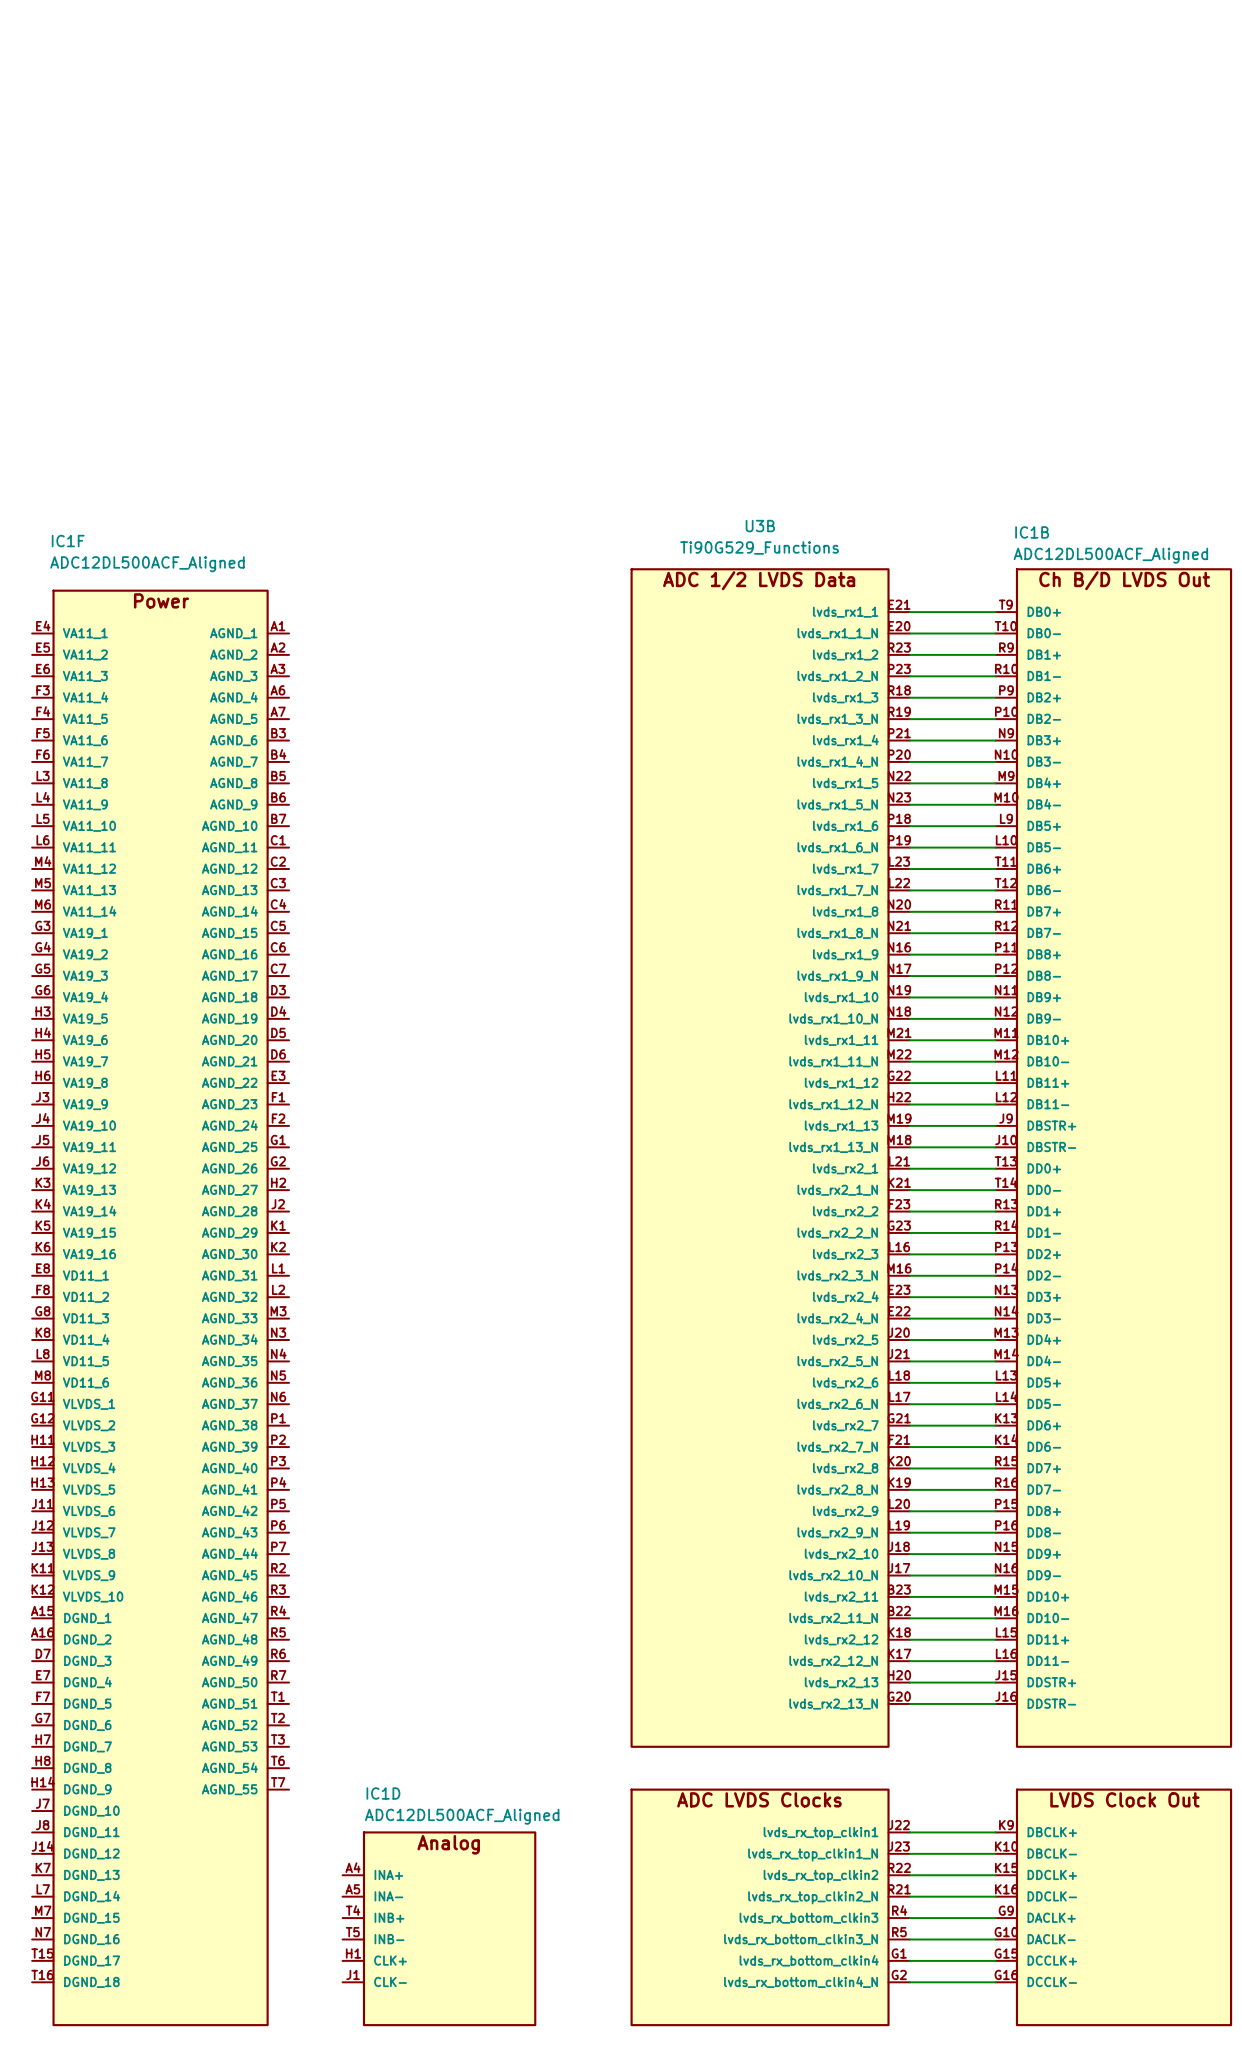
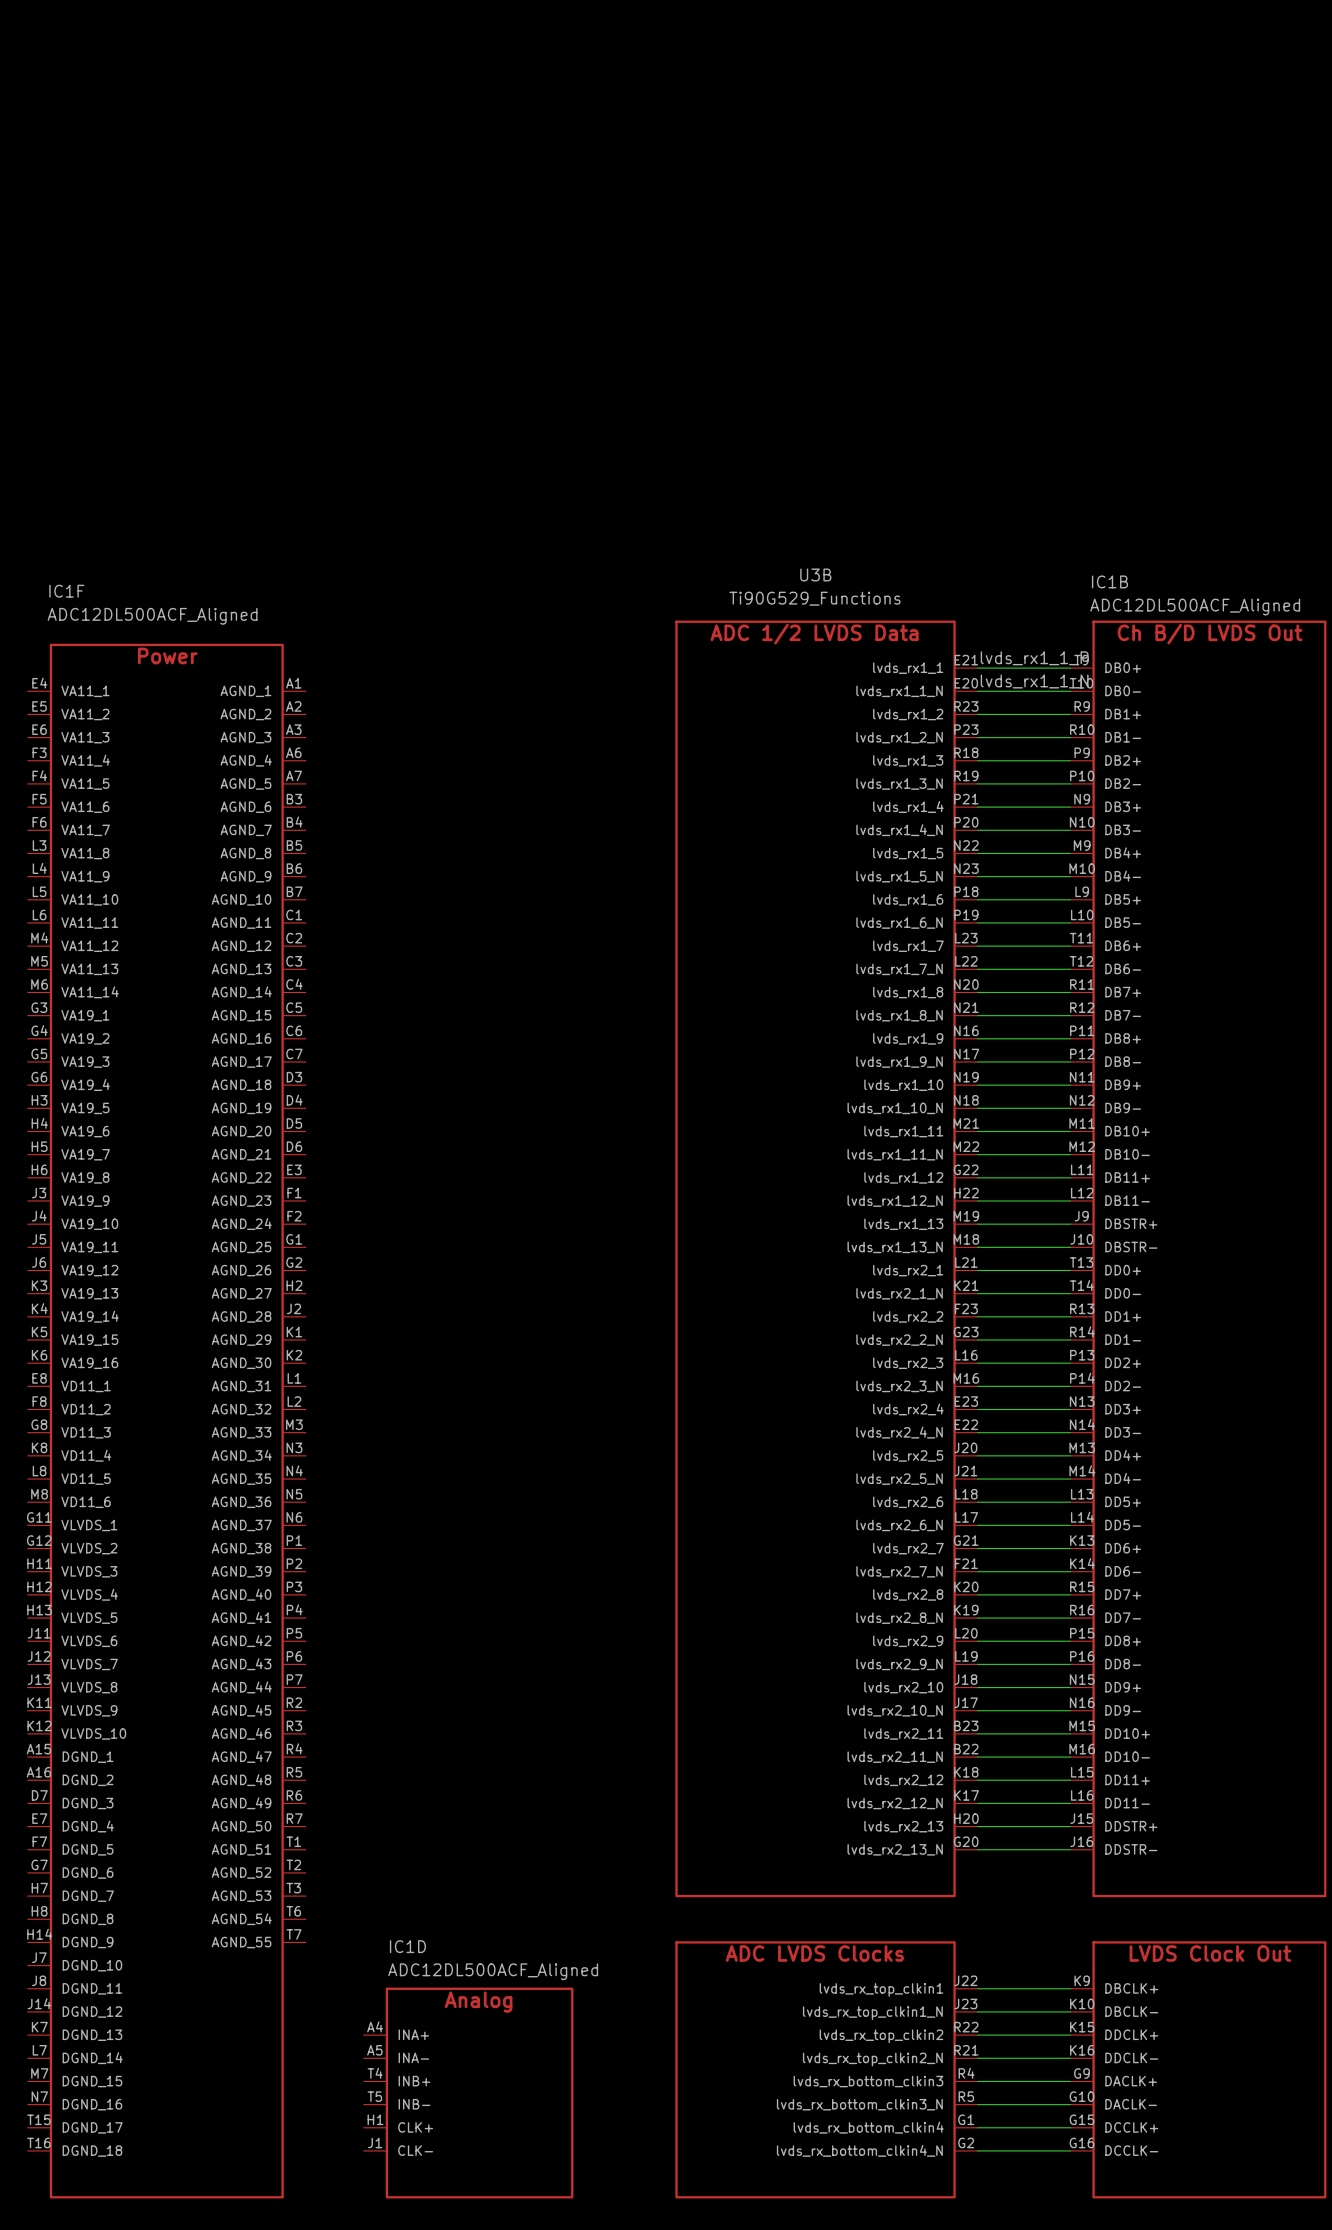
label: none -> lvds_rx1_1_P (1034, 658)
label: none -> lvds_rx1_1_N (1034, 681)

